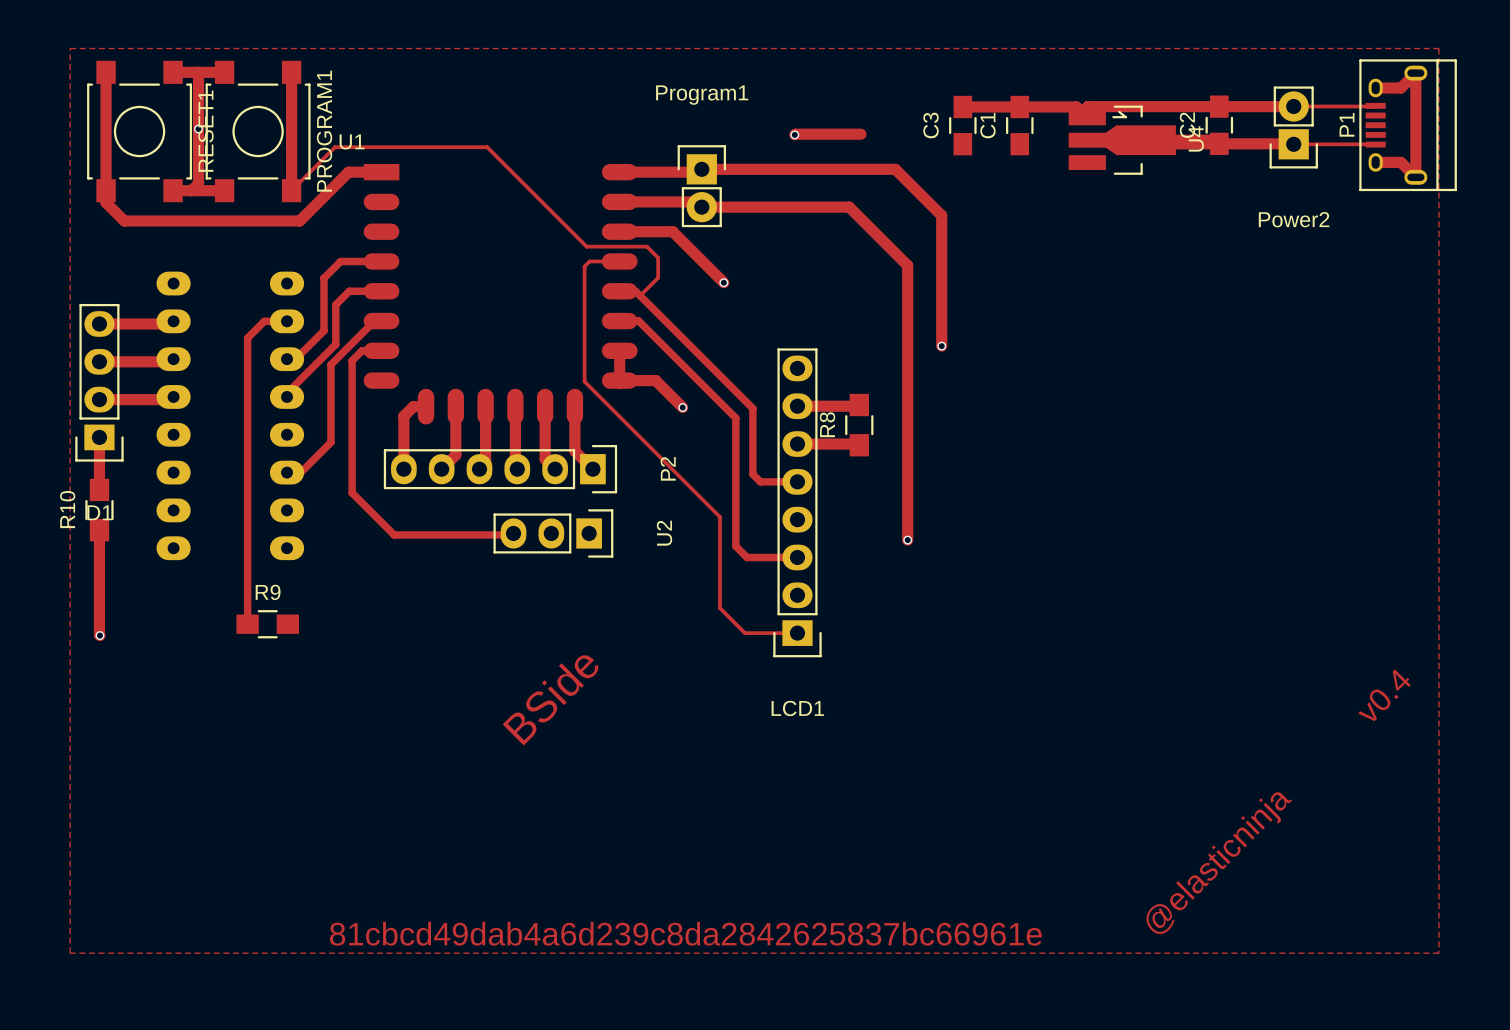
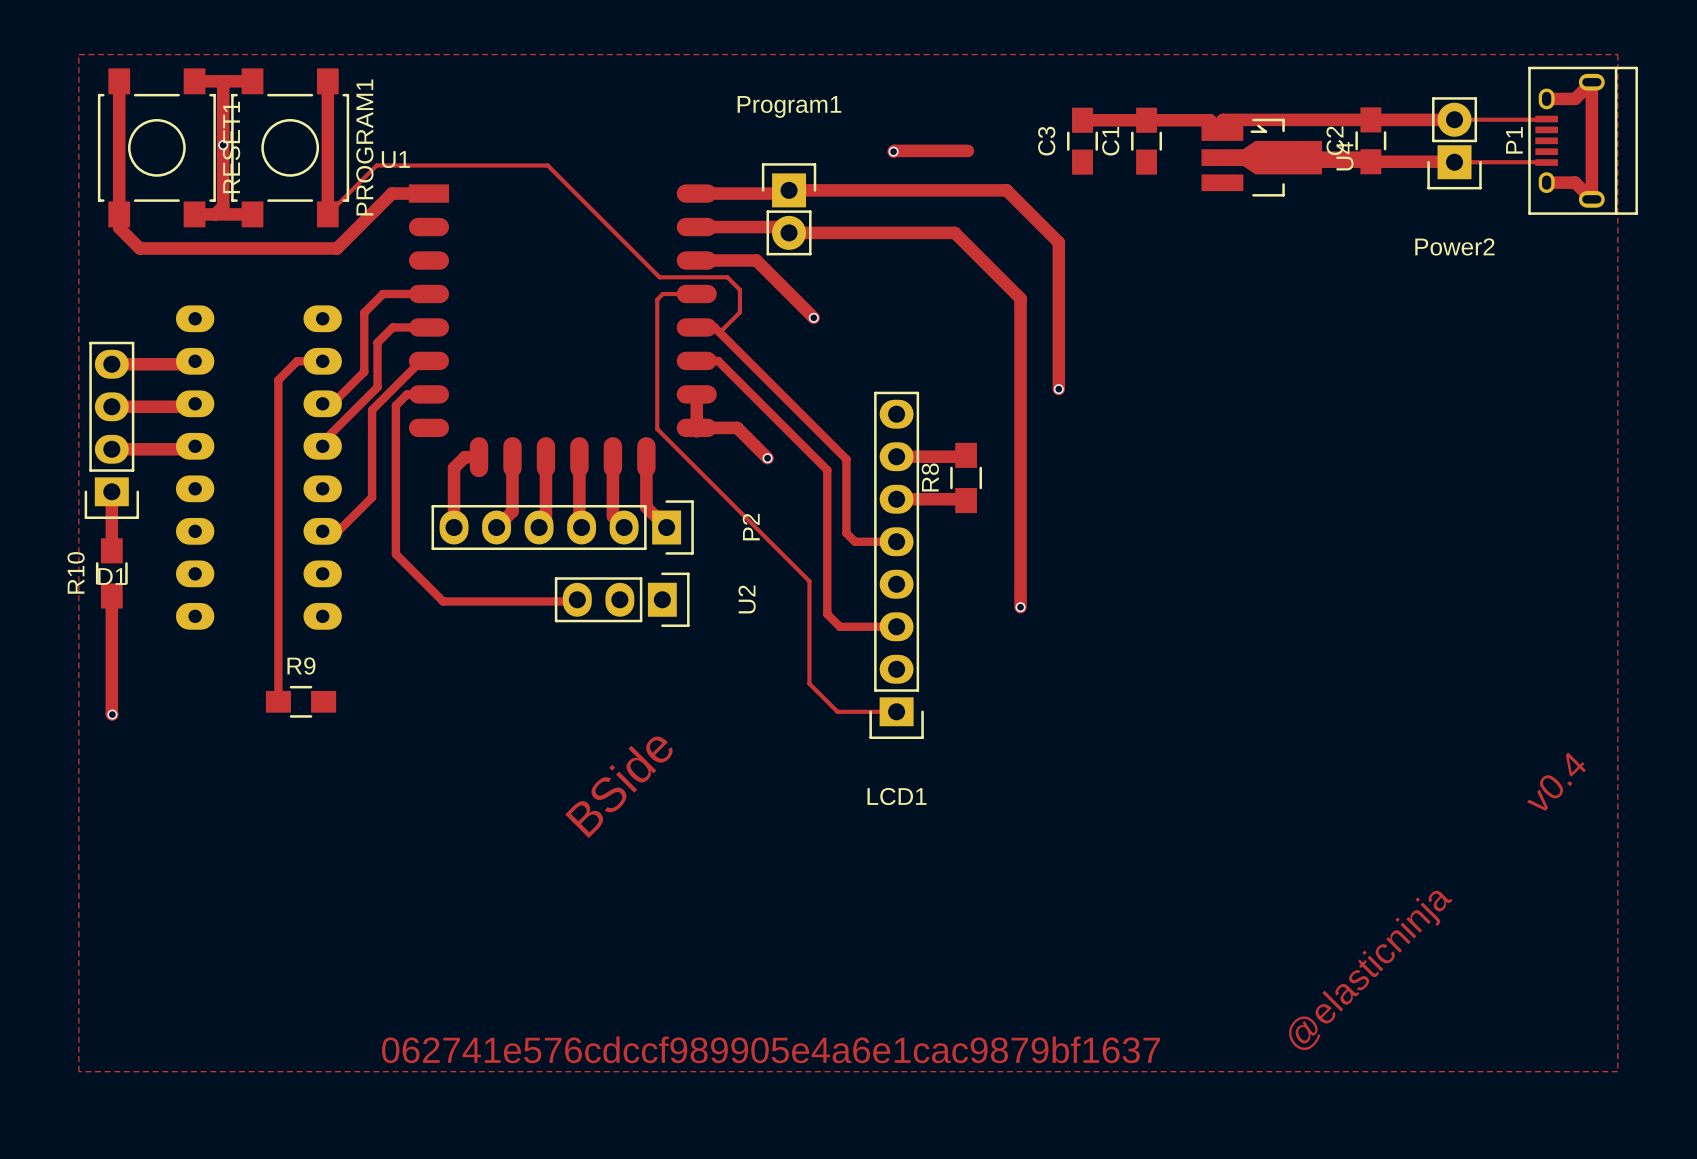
text: 81cbcd49dab4a6d239c8da2842625837bc66961e (685, 933) -> 062741e576cdccf989905e4a6e1cac9879bf1637 (770, 1049)

